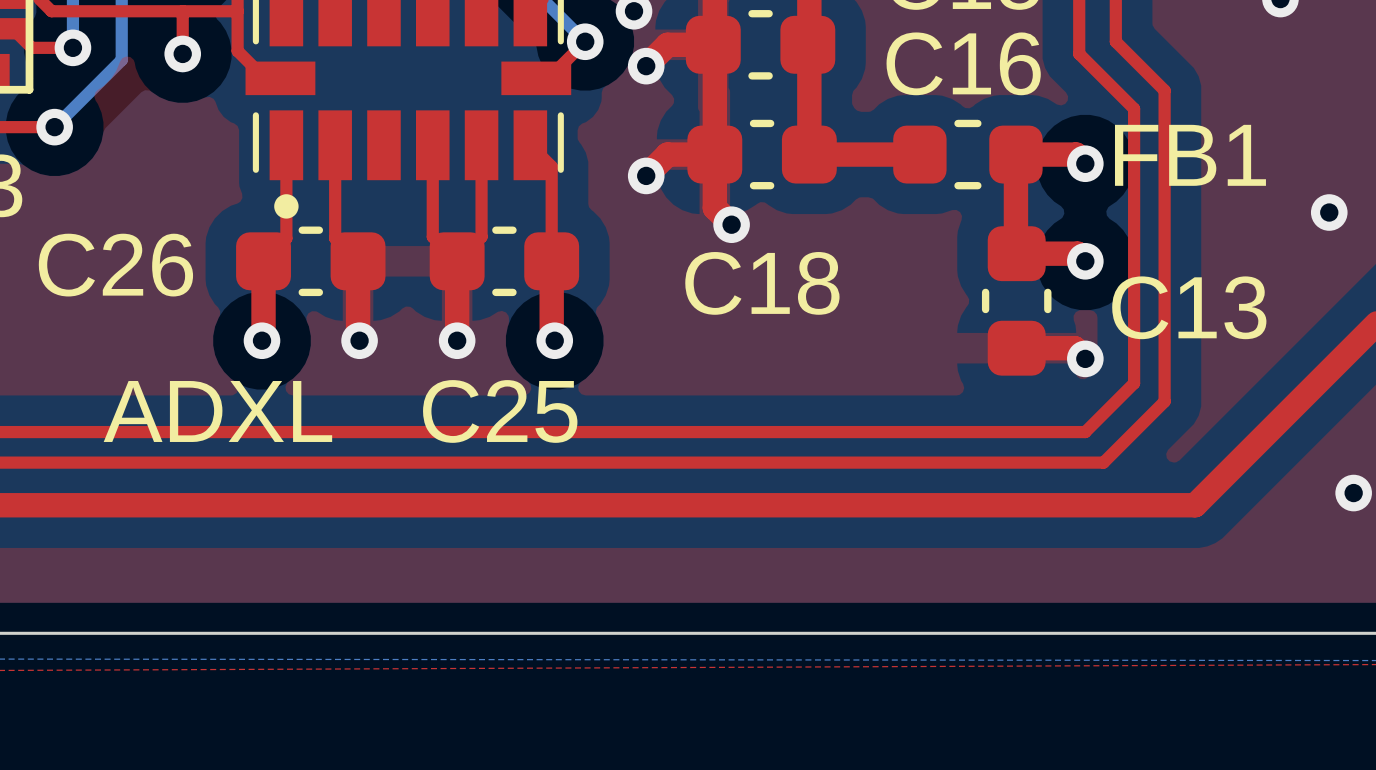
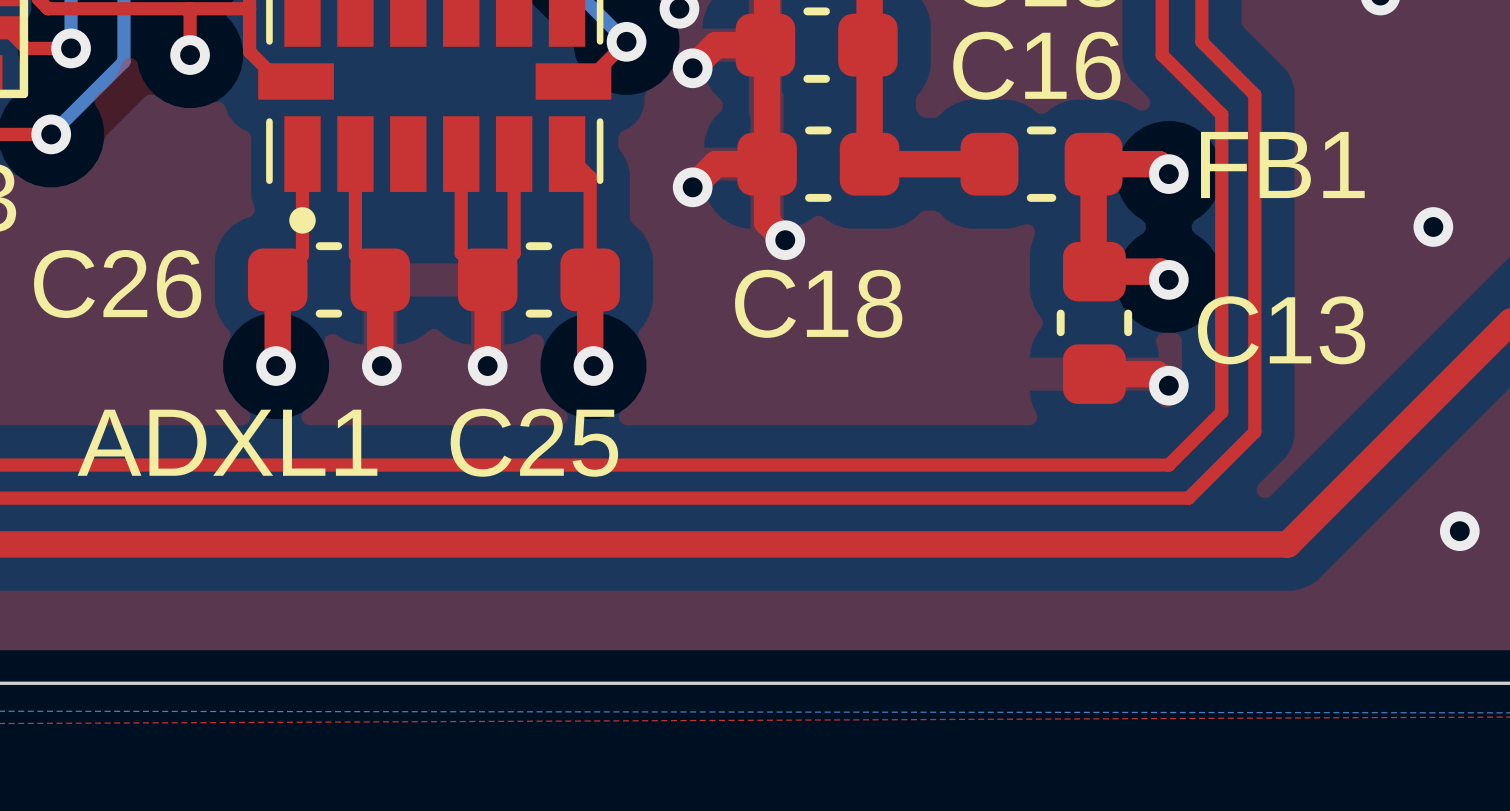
ADXL name: ADXL (217, 411) -> ADXL1 (227, 442)

